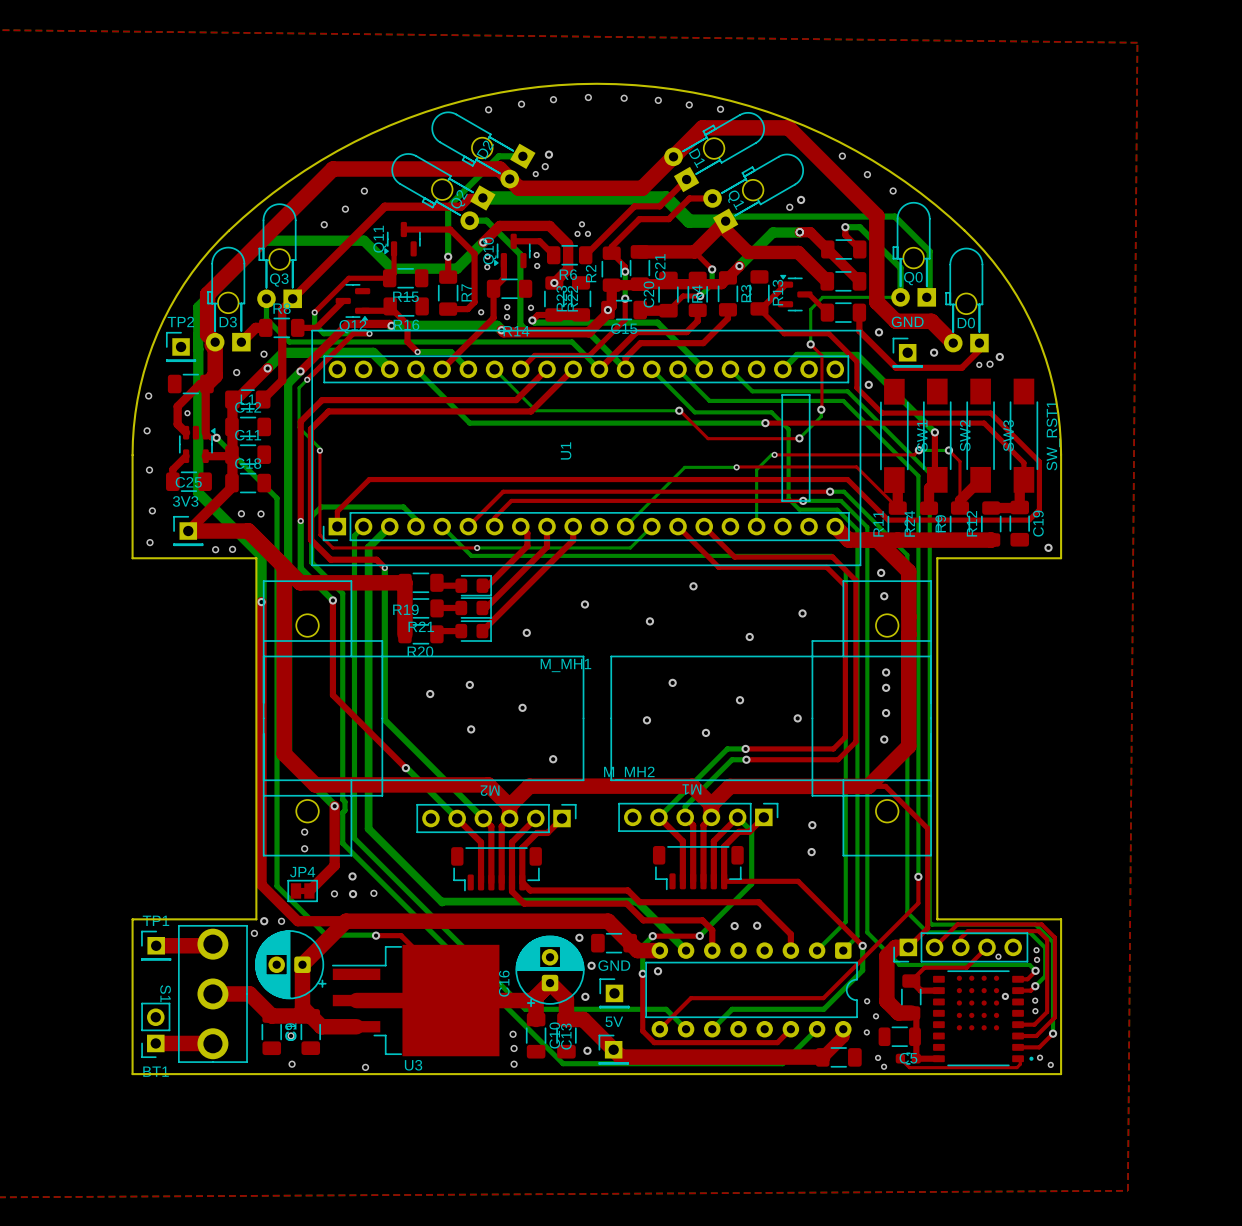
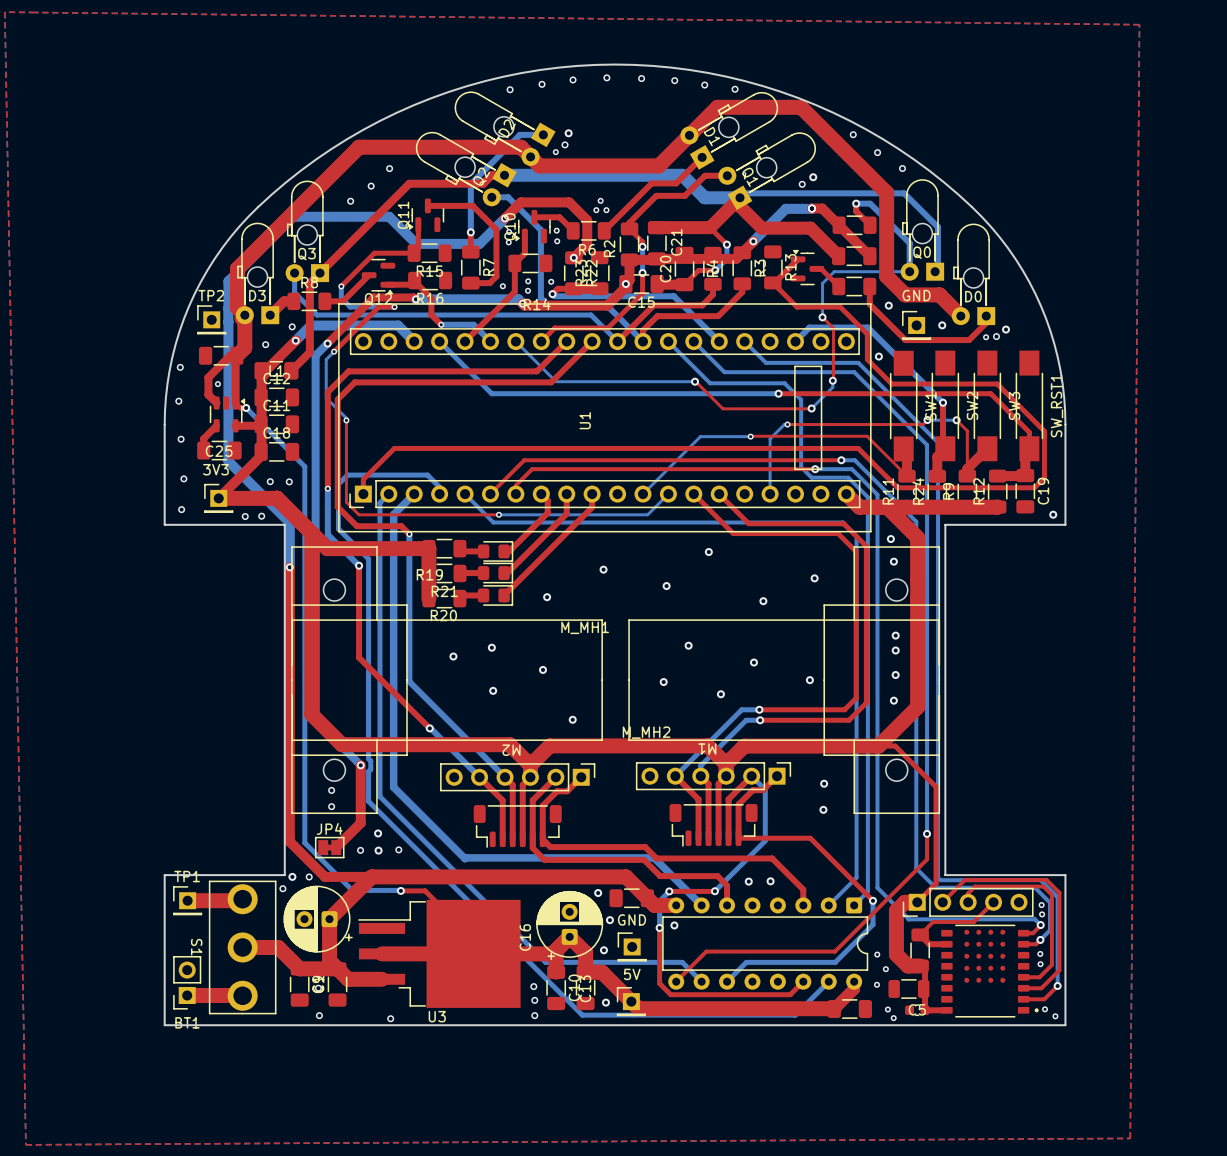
via: (998, 956) -> none
via: (1005, 996) -> none
top track: (900, 1058) (909, 1067) (1016, 1067) (1020, 1064) (1018, 1058) -> none

